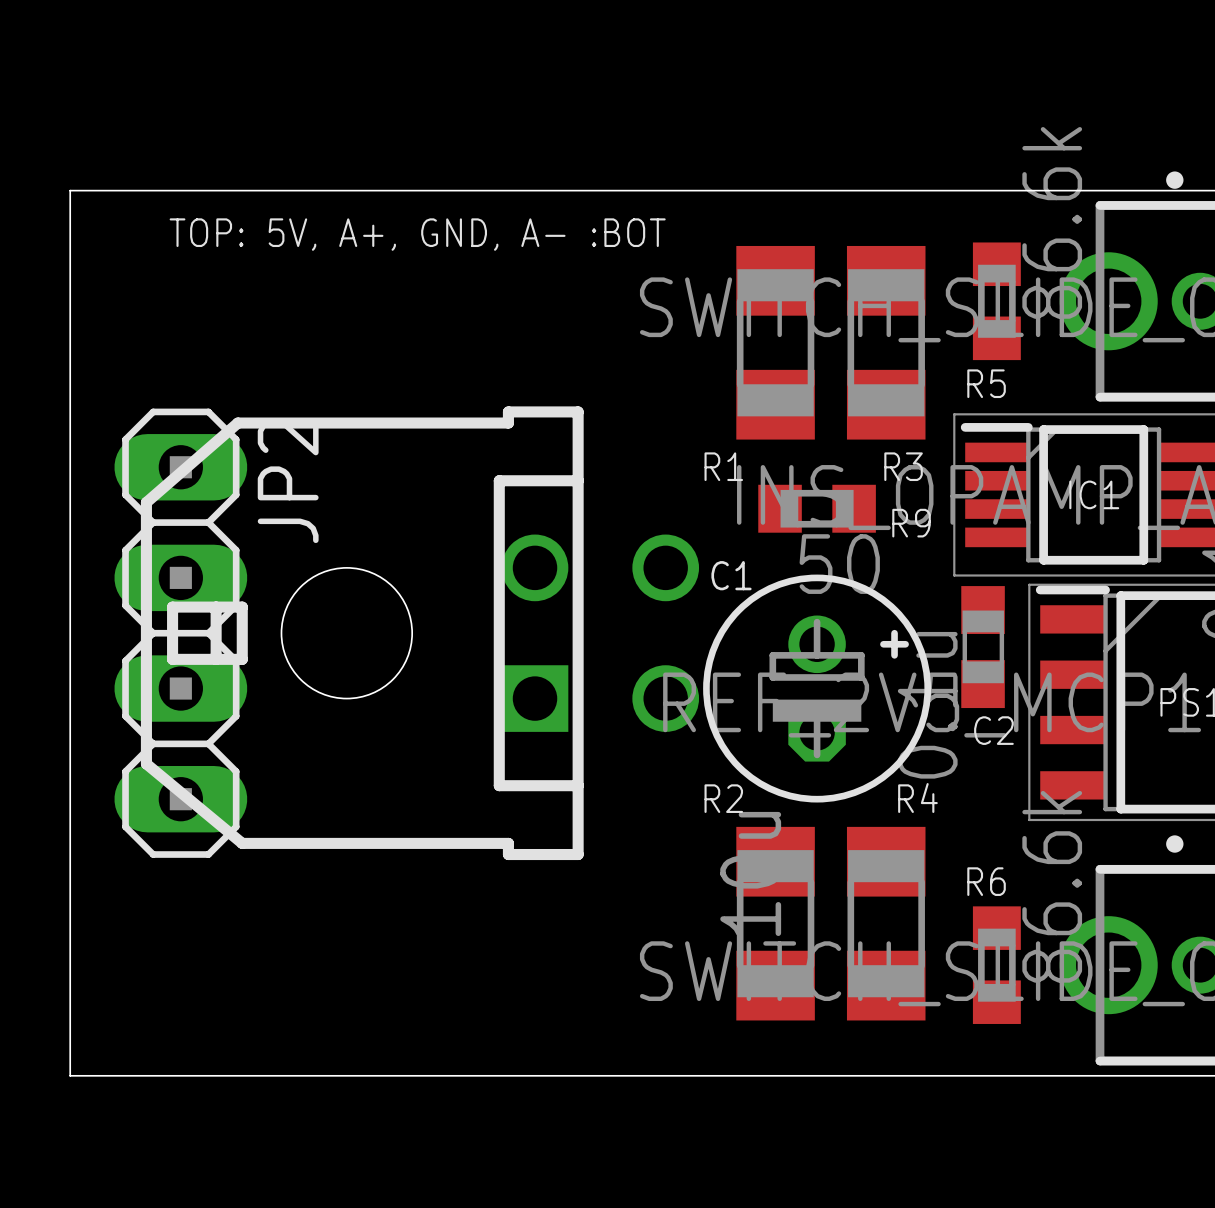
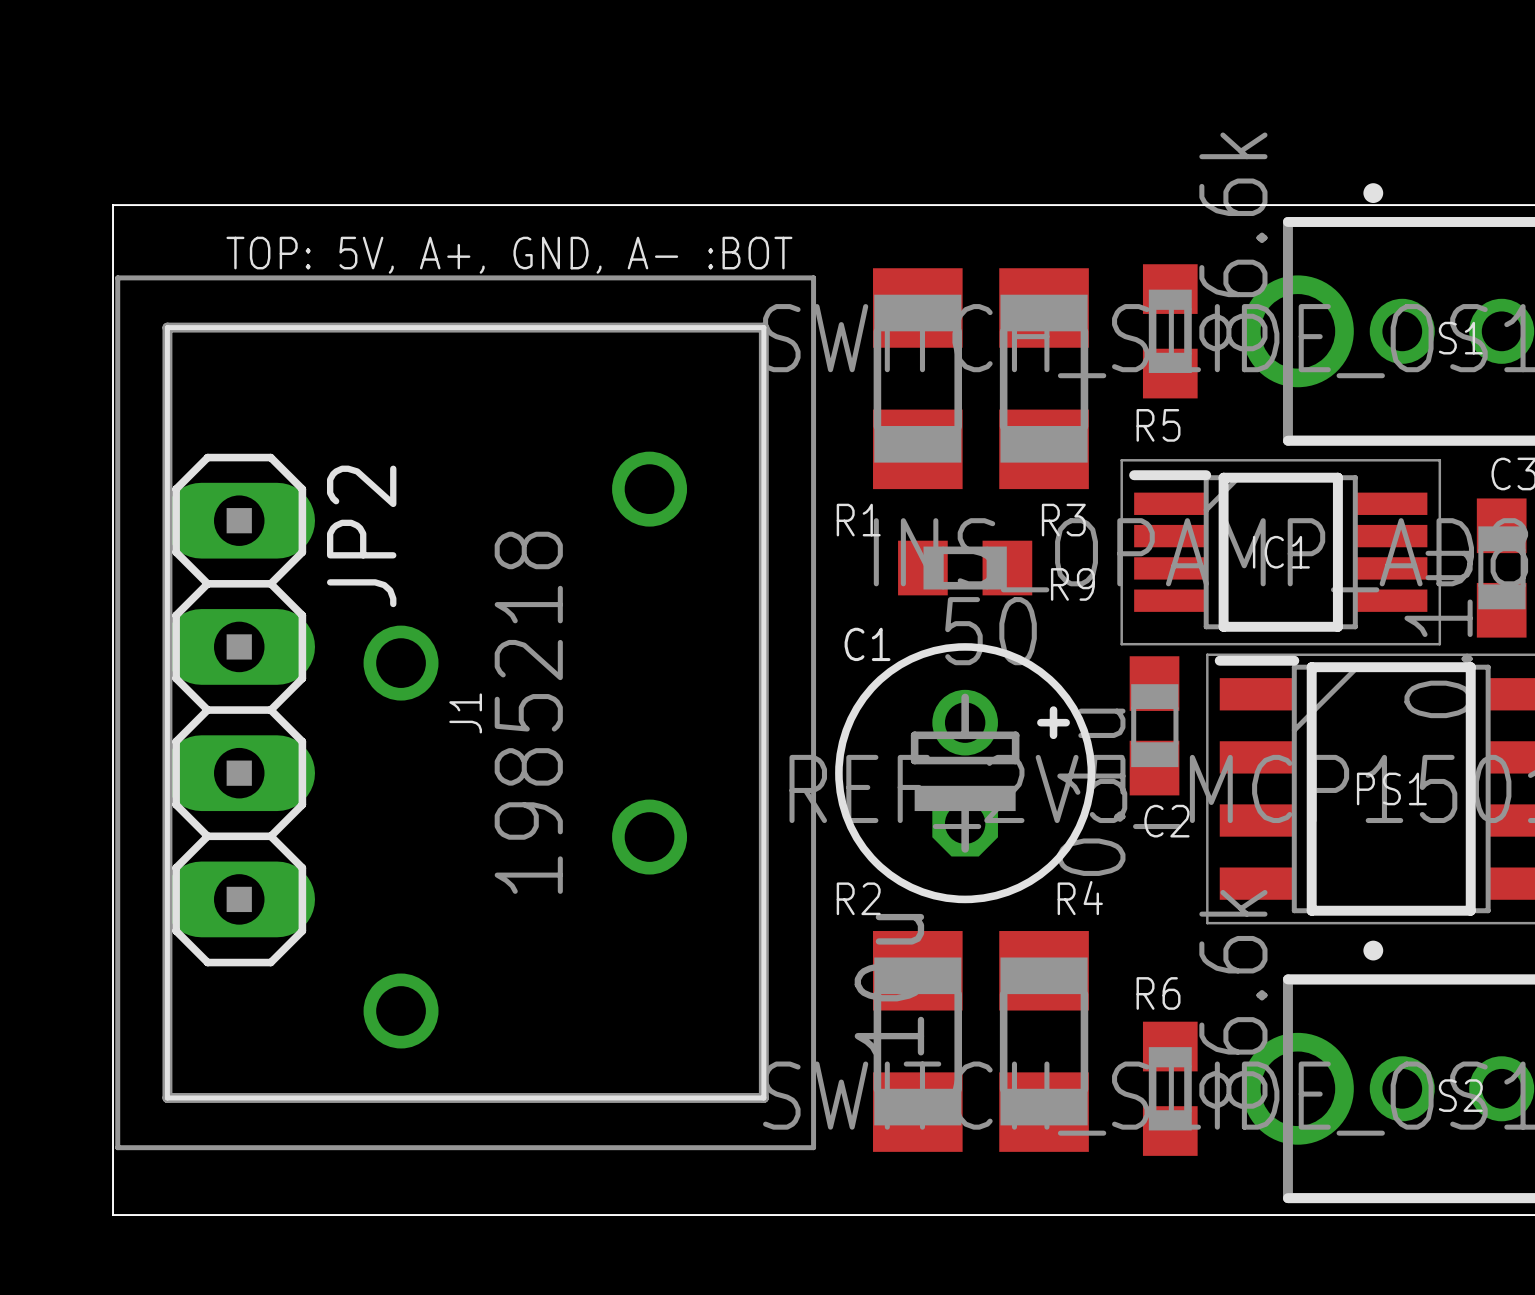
part: (419, 633) -> none
J1: none -> 1985218 (465, 712)

